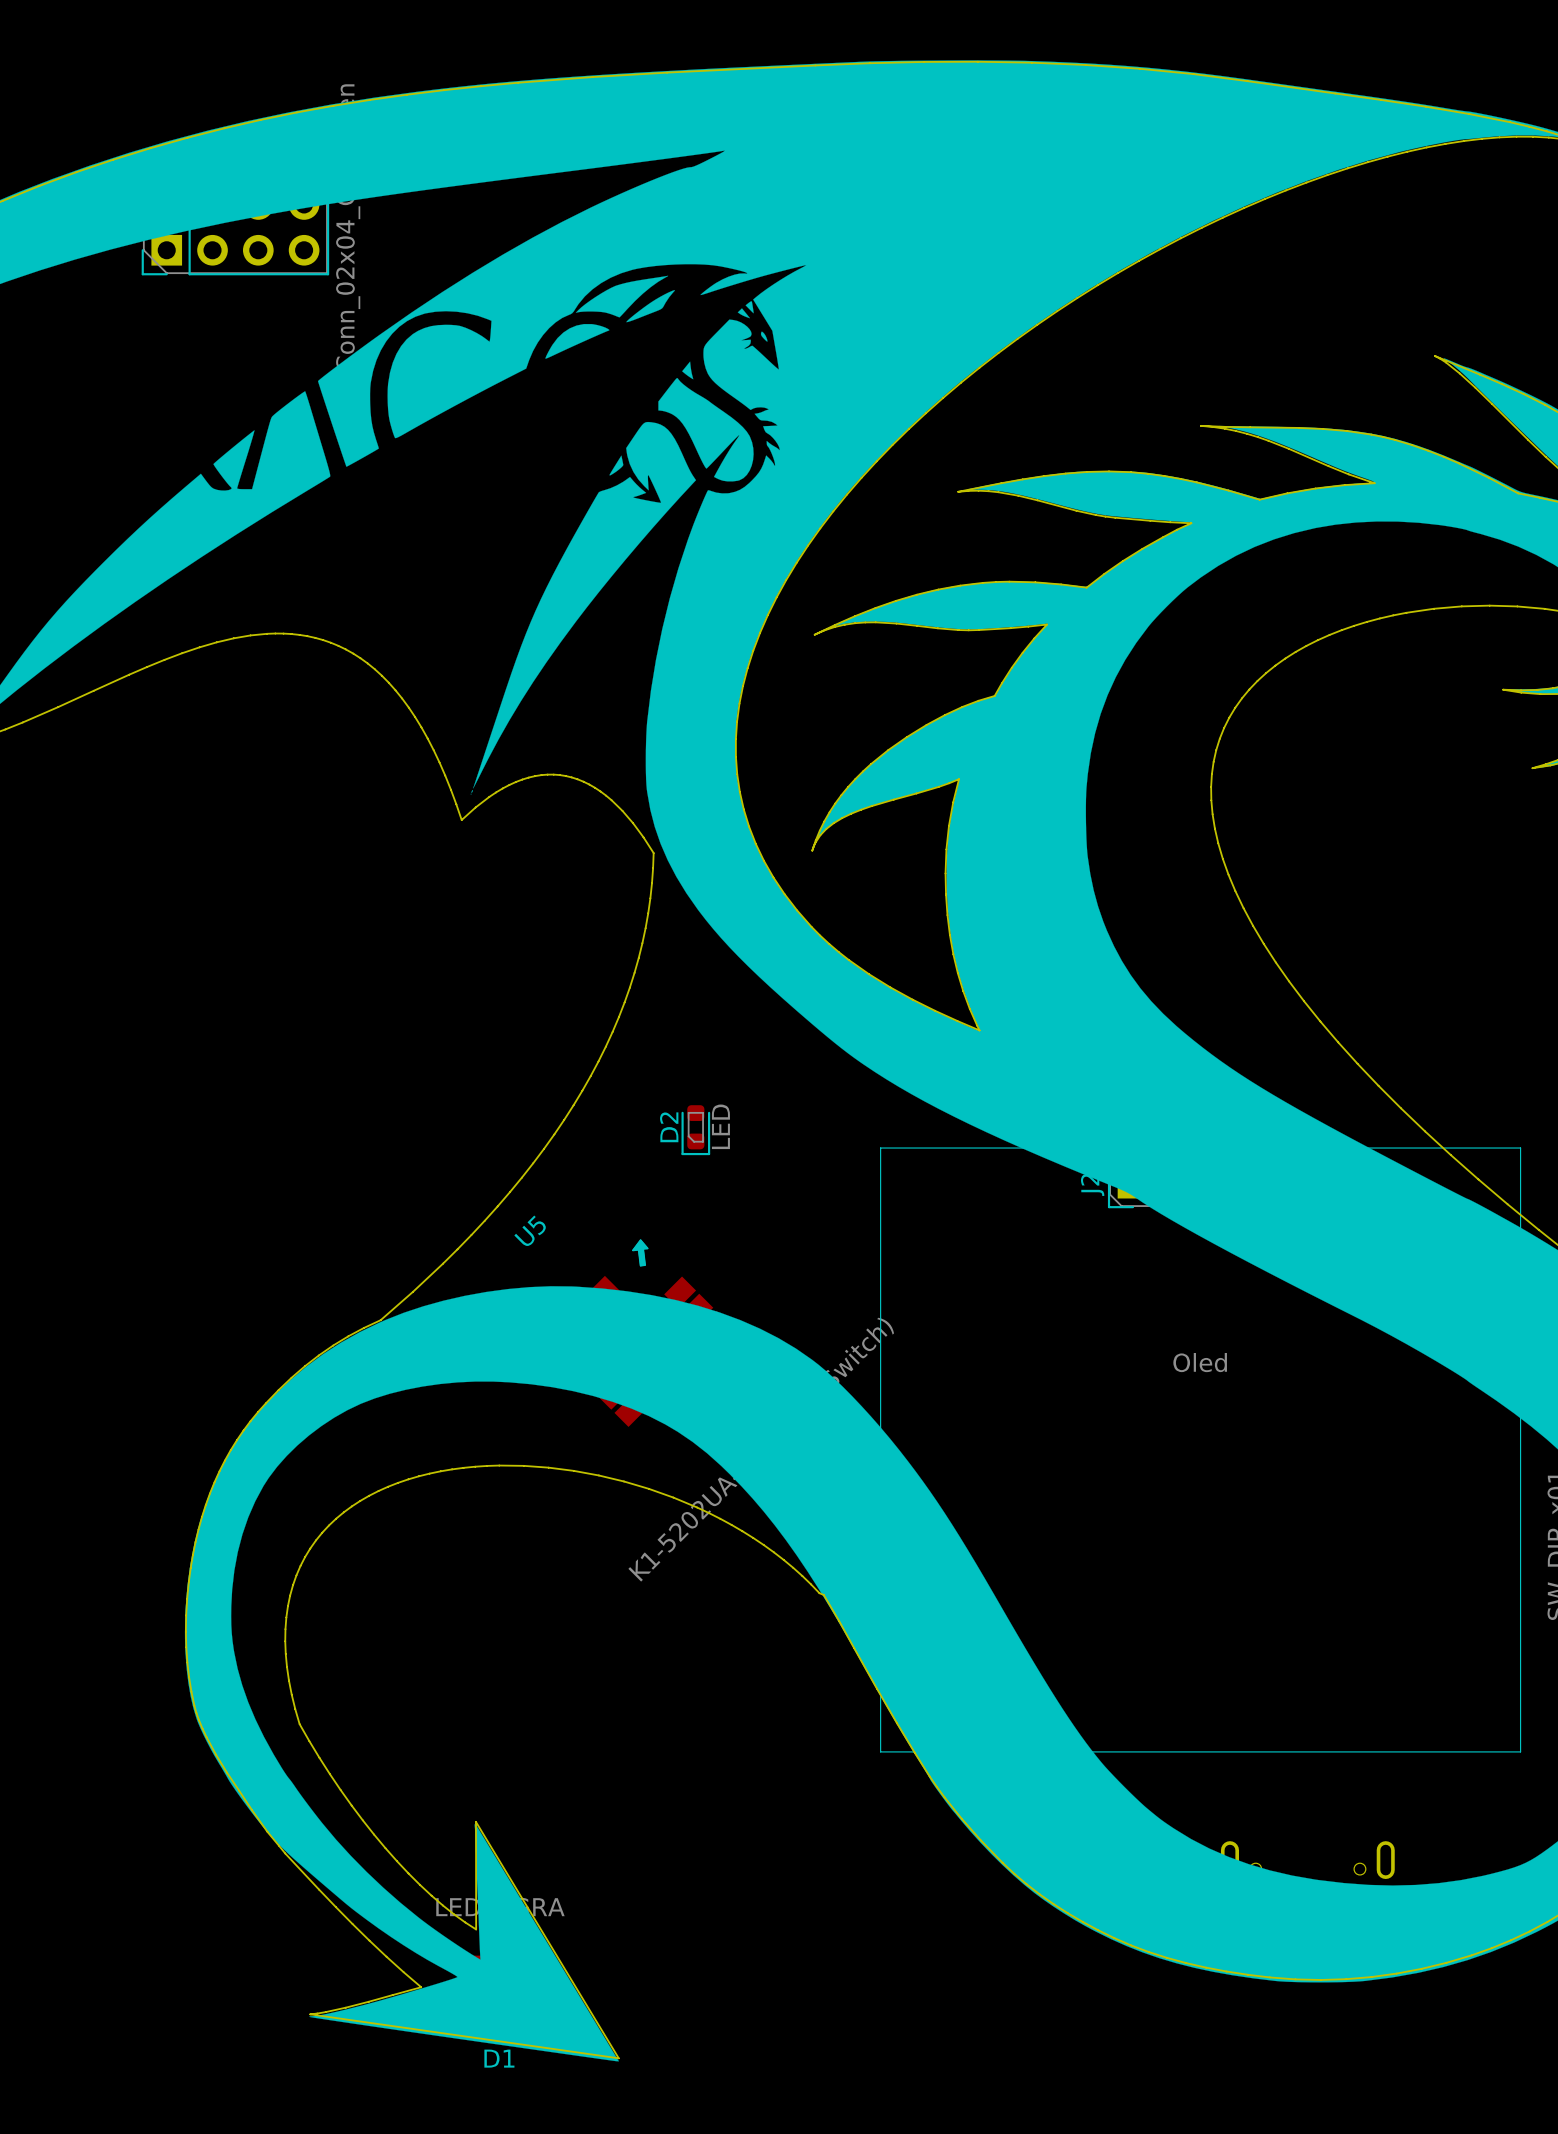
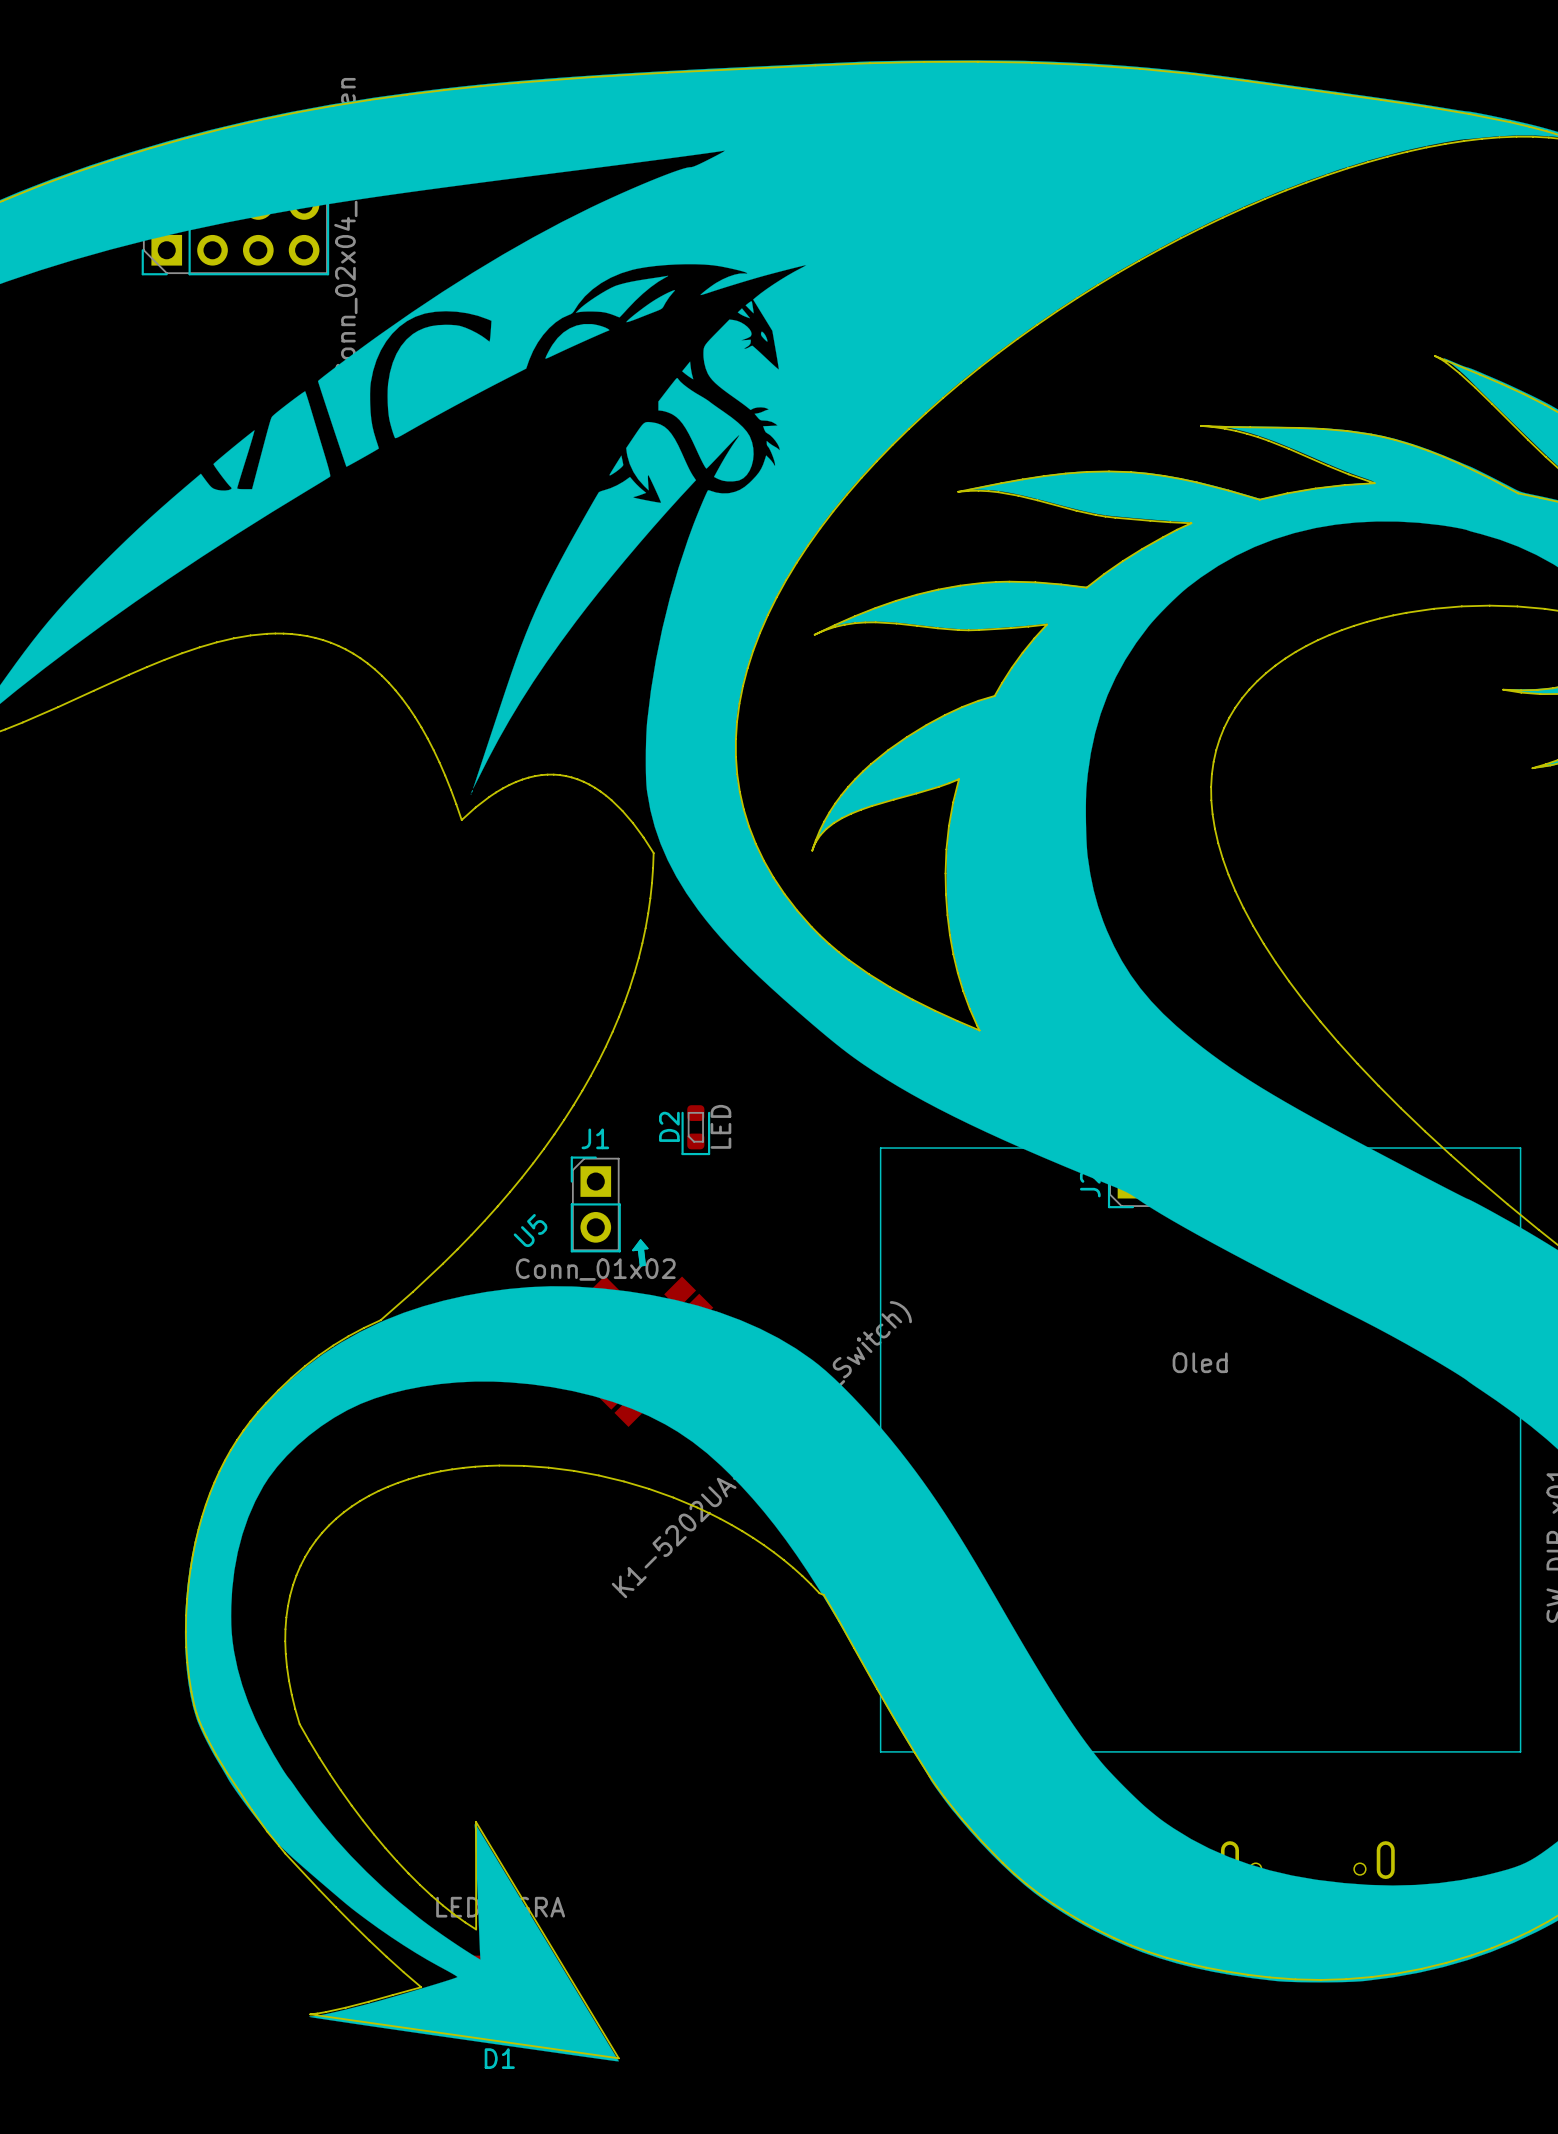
J1: none -> Conn_01x02 (595, 1204)

